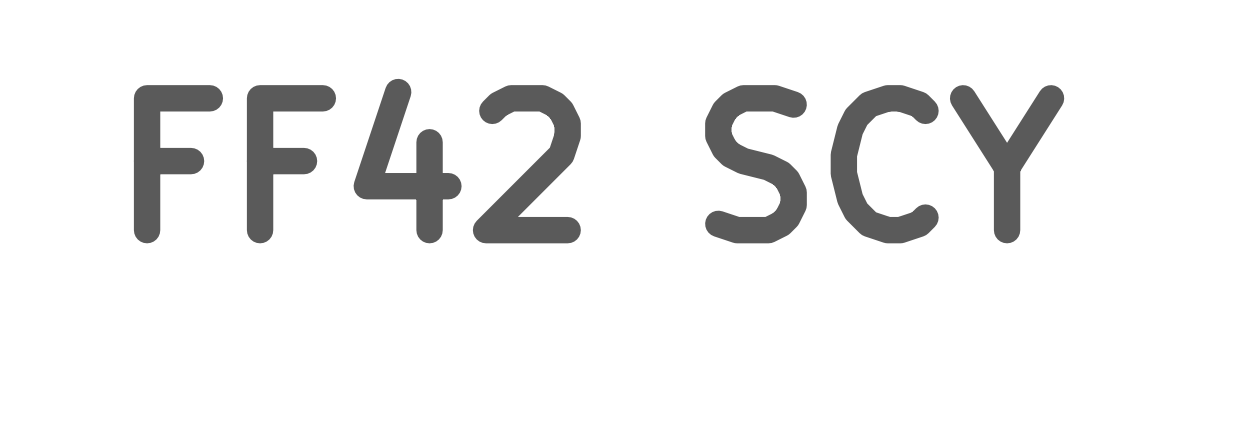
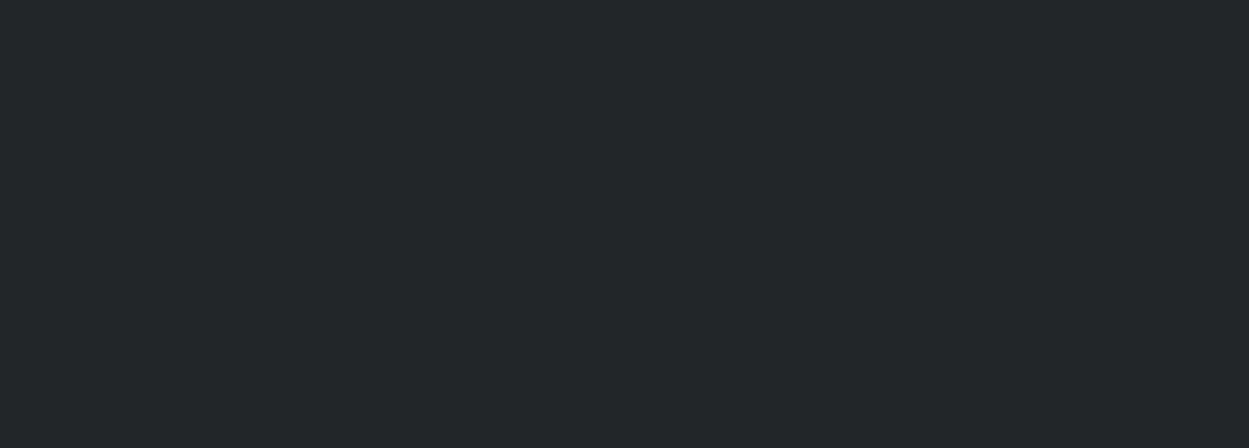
text: FF42 SCY (599, 161) -> none

